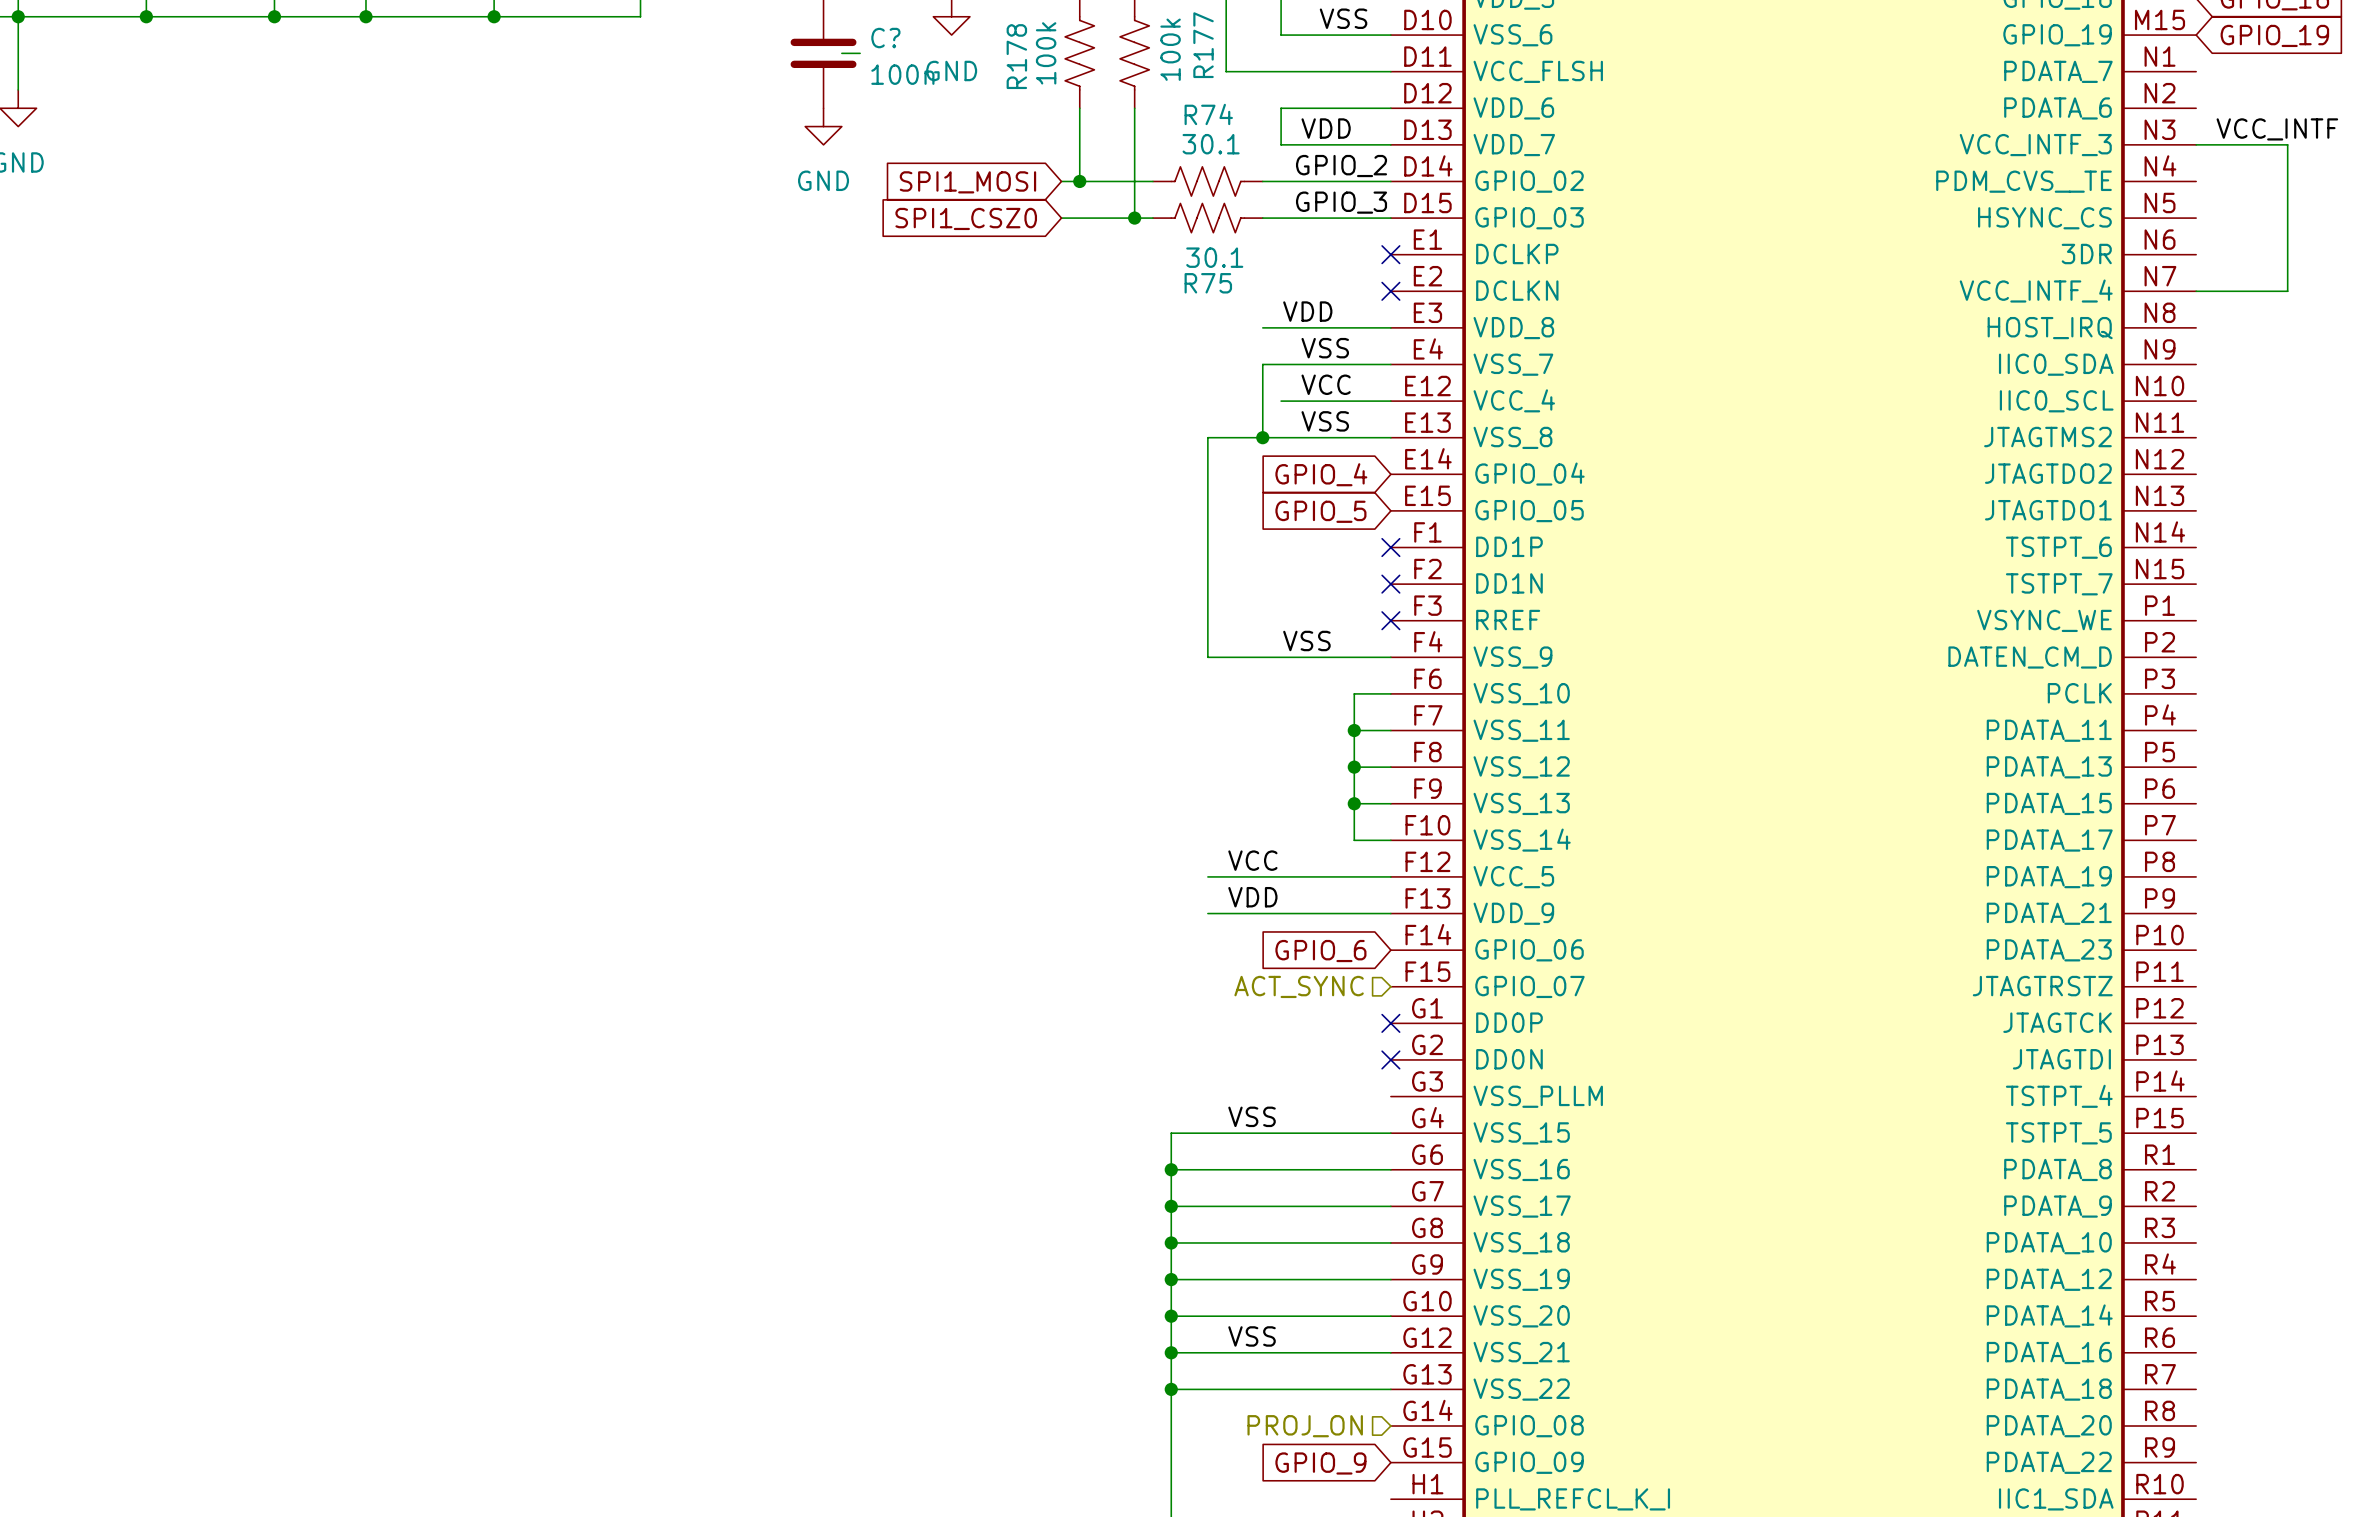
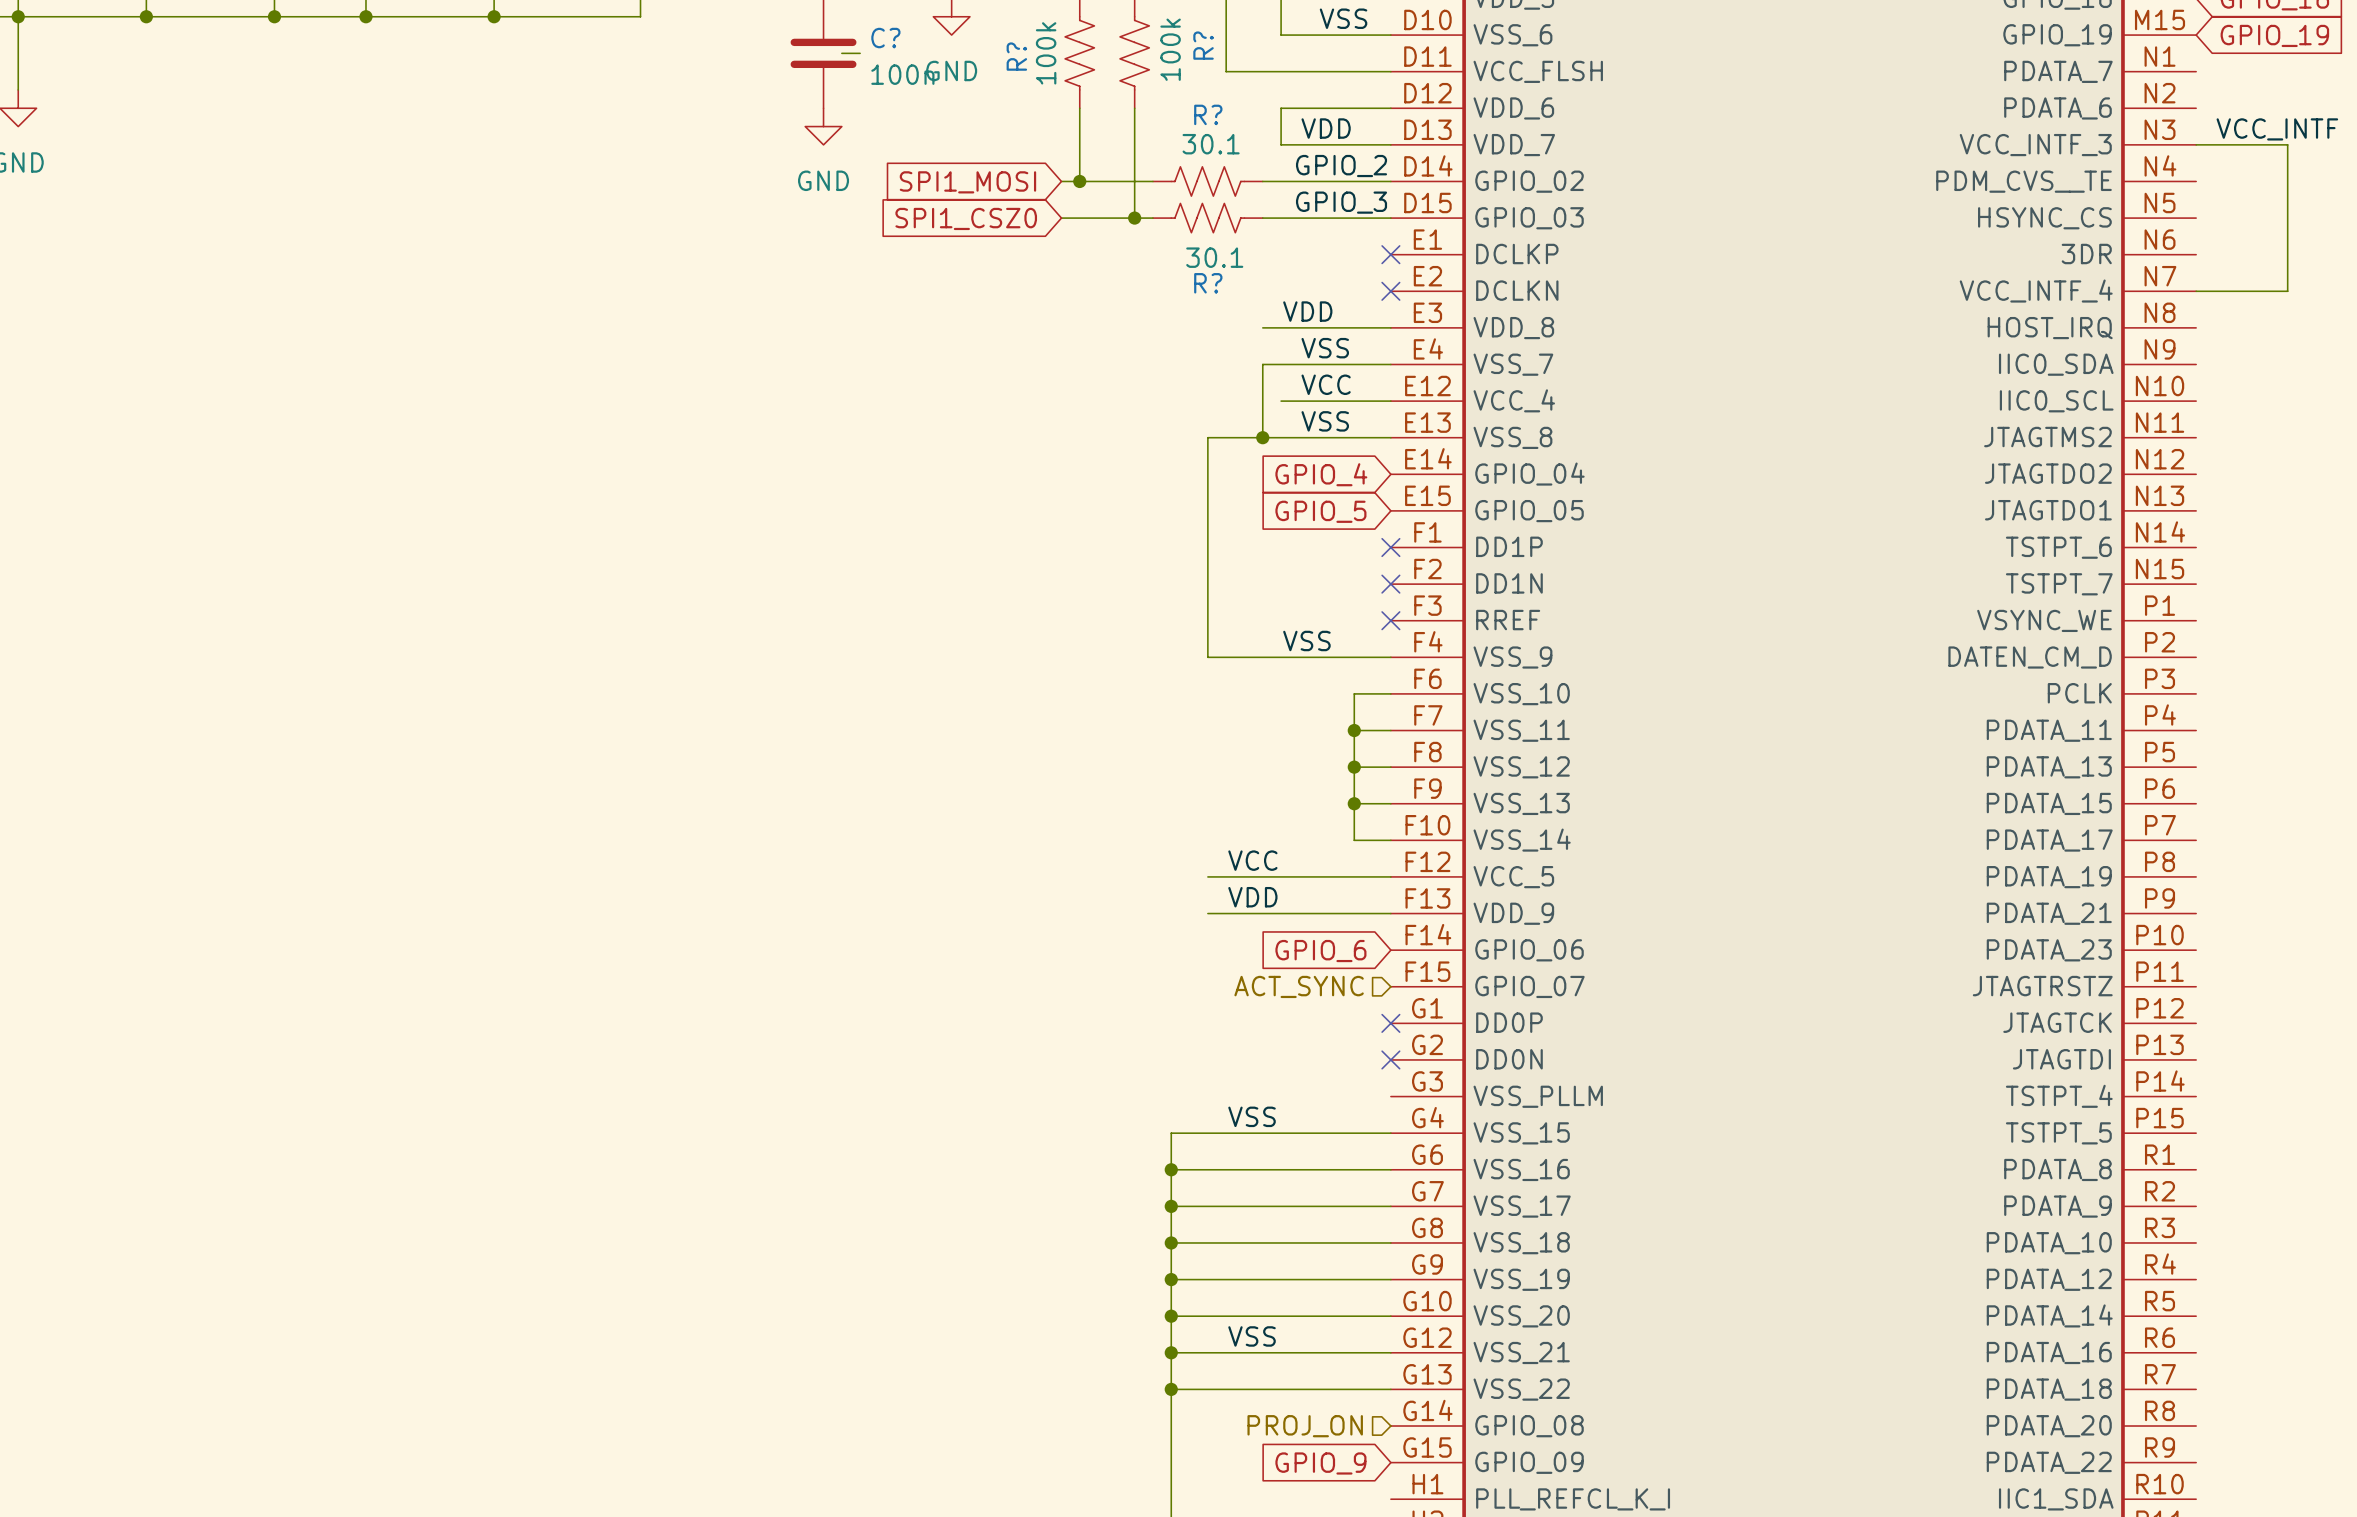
R177 name: R177 (1203, 45) -> R? (1203, 45)
R178 name: R178 (1016, 56) -> R? (1016, 56)
R74 name: R74 (1208, 114) -> R? (1208, 114)
R75 name: R75 (1208, 283) -> R? (1208, 283)

